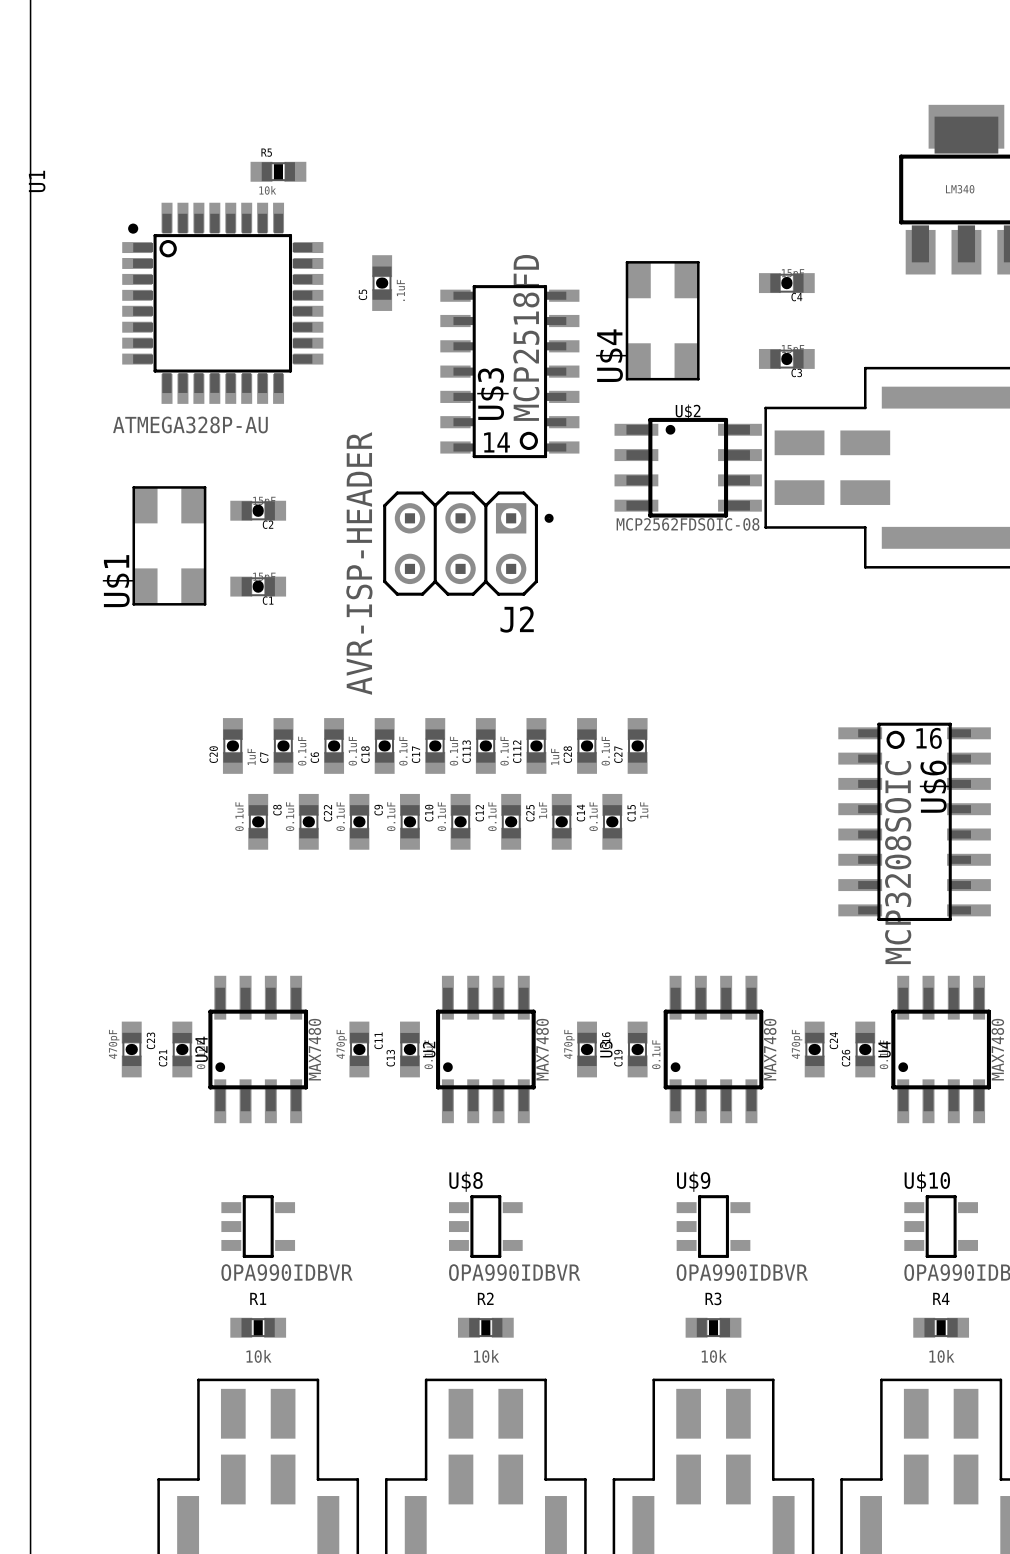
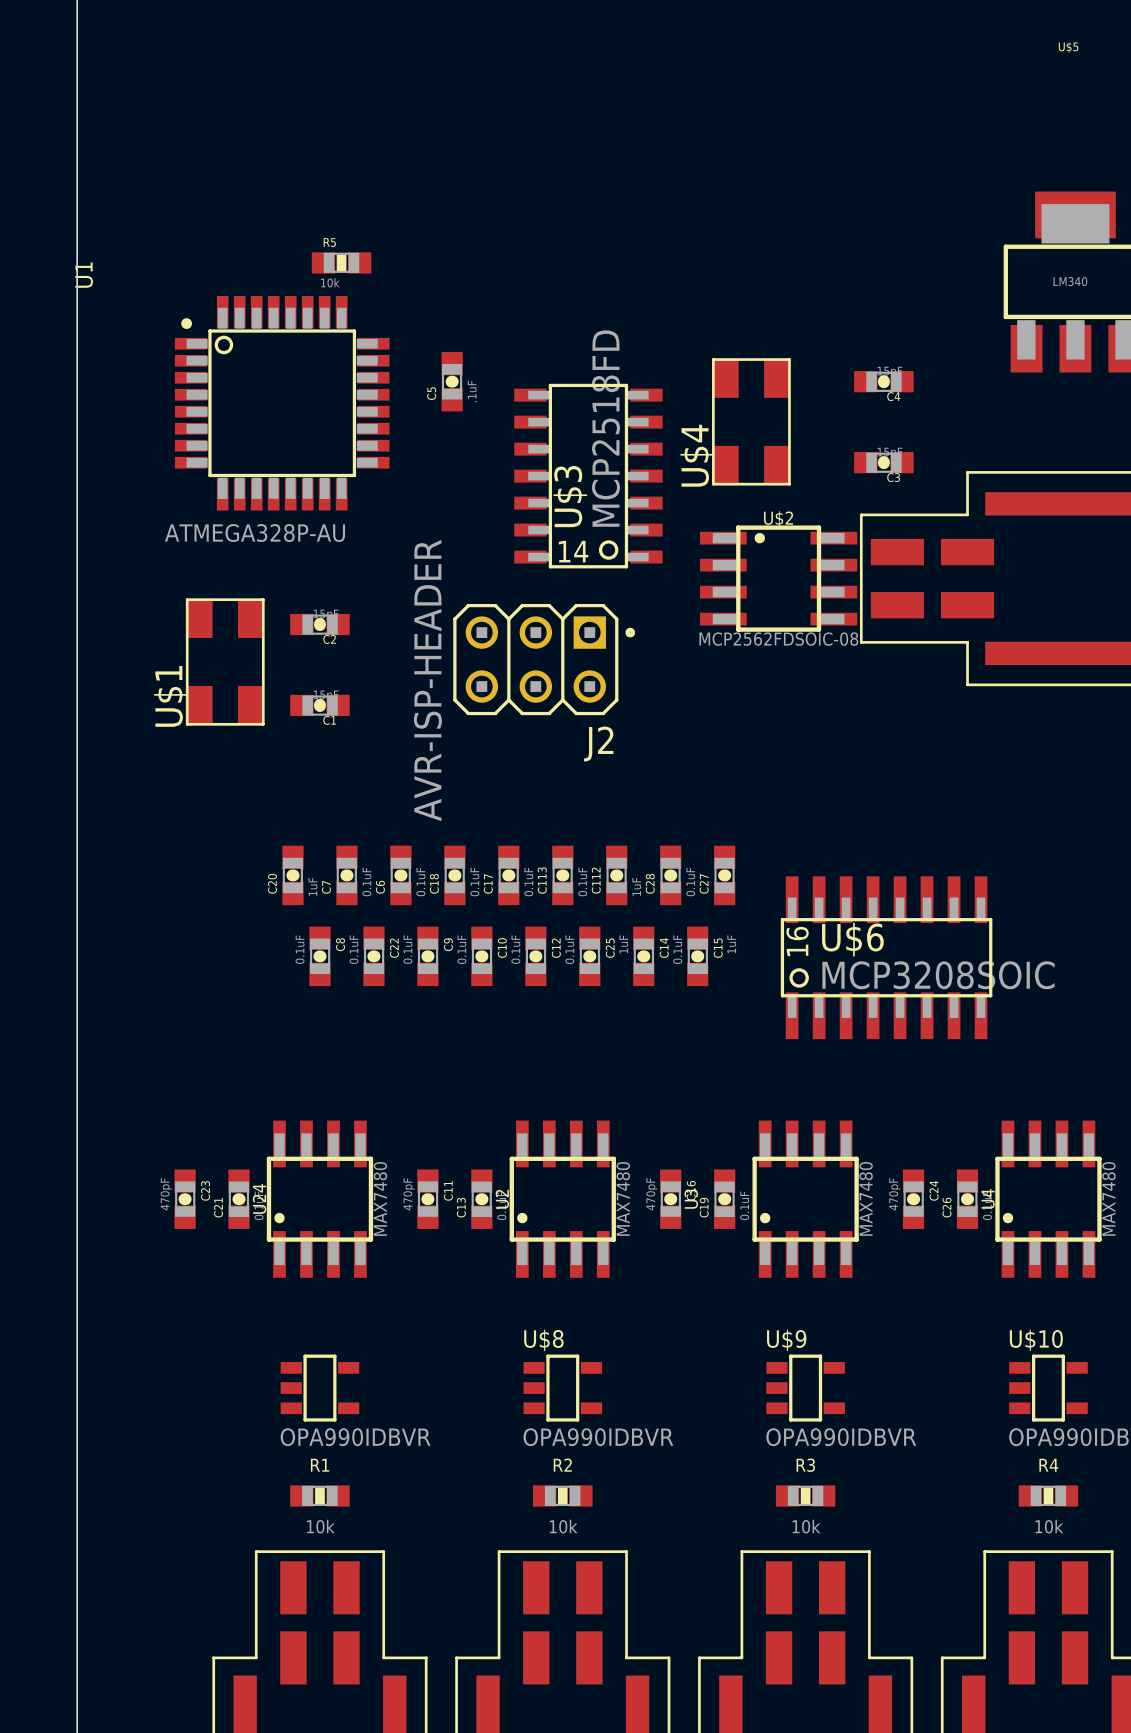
U$6 rotation: 0° (914, 821) -> 90° counterclockwise (886, 957)
U$6 position: (914, 821) -> (886, 957)

